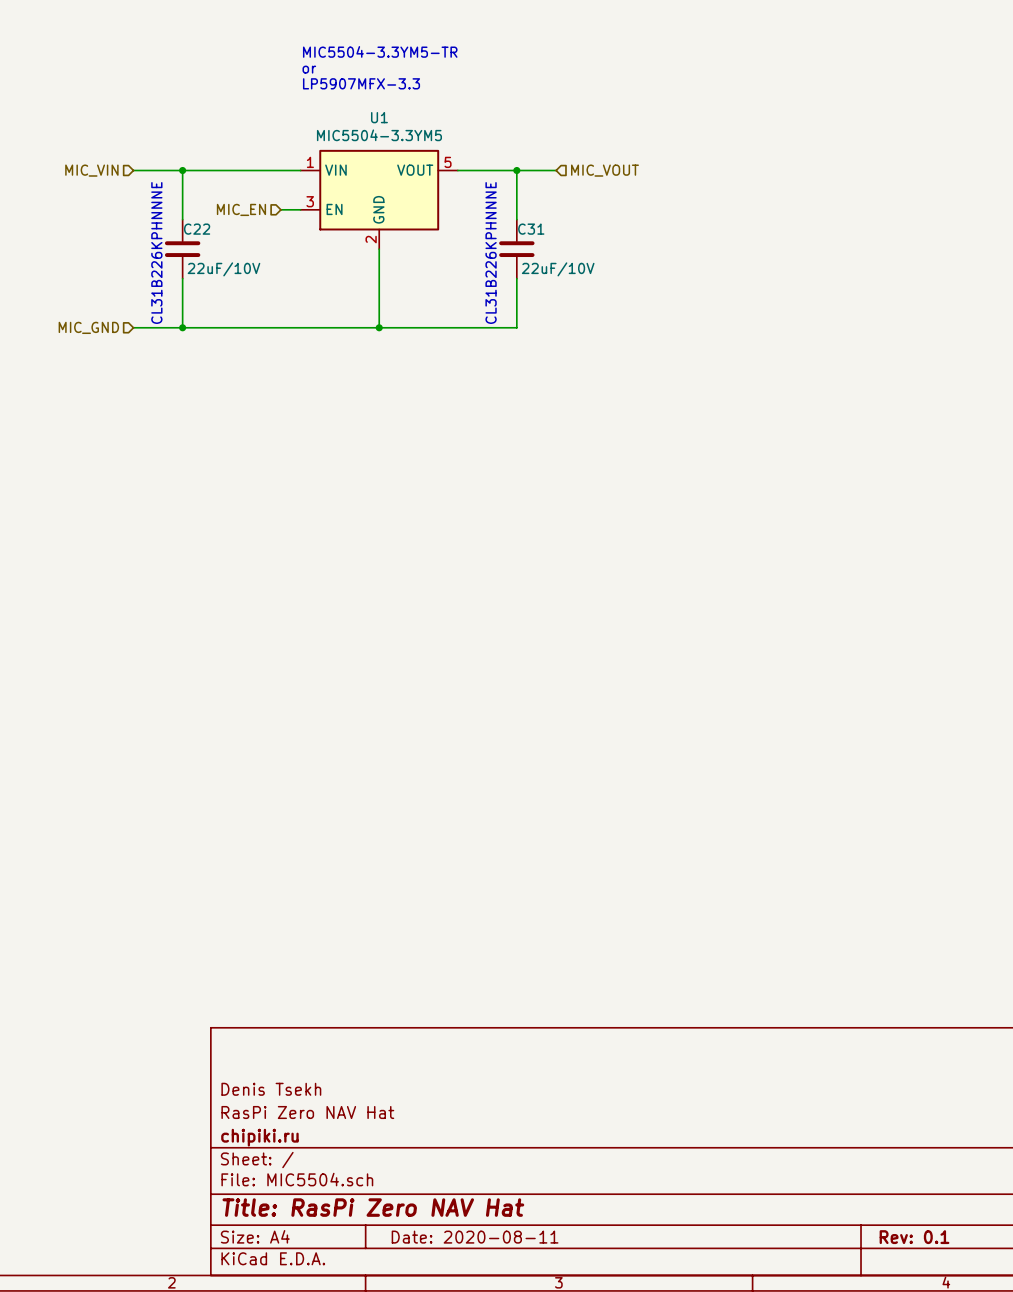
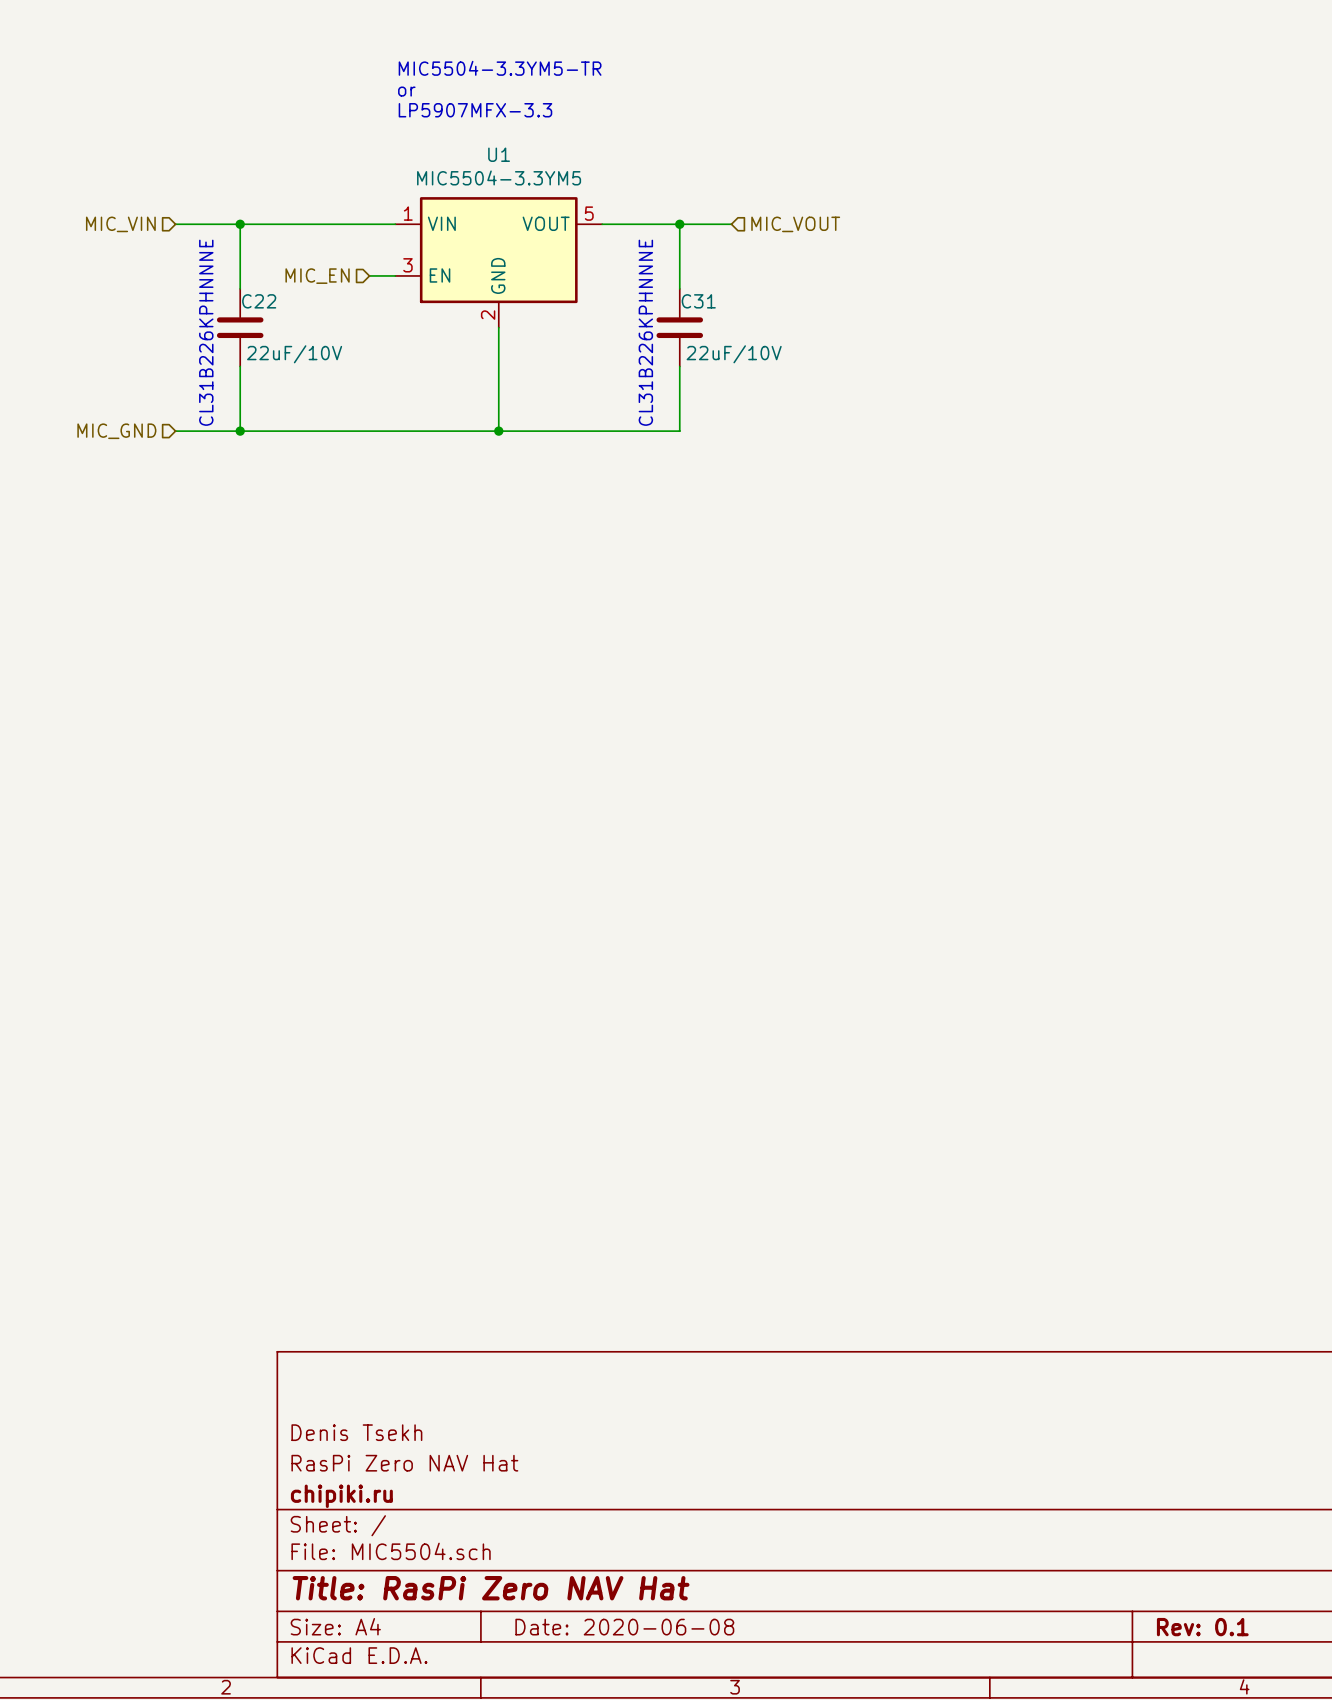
title block: Date: 2020-08-11 (475, 1237) -> Date: 2020-06-08 (624, 1627)

